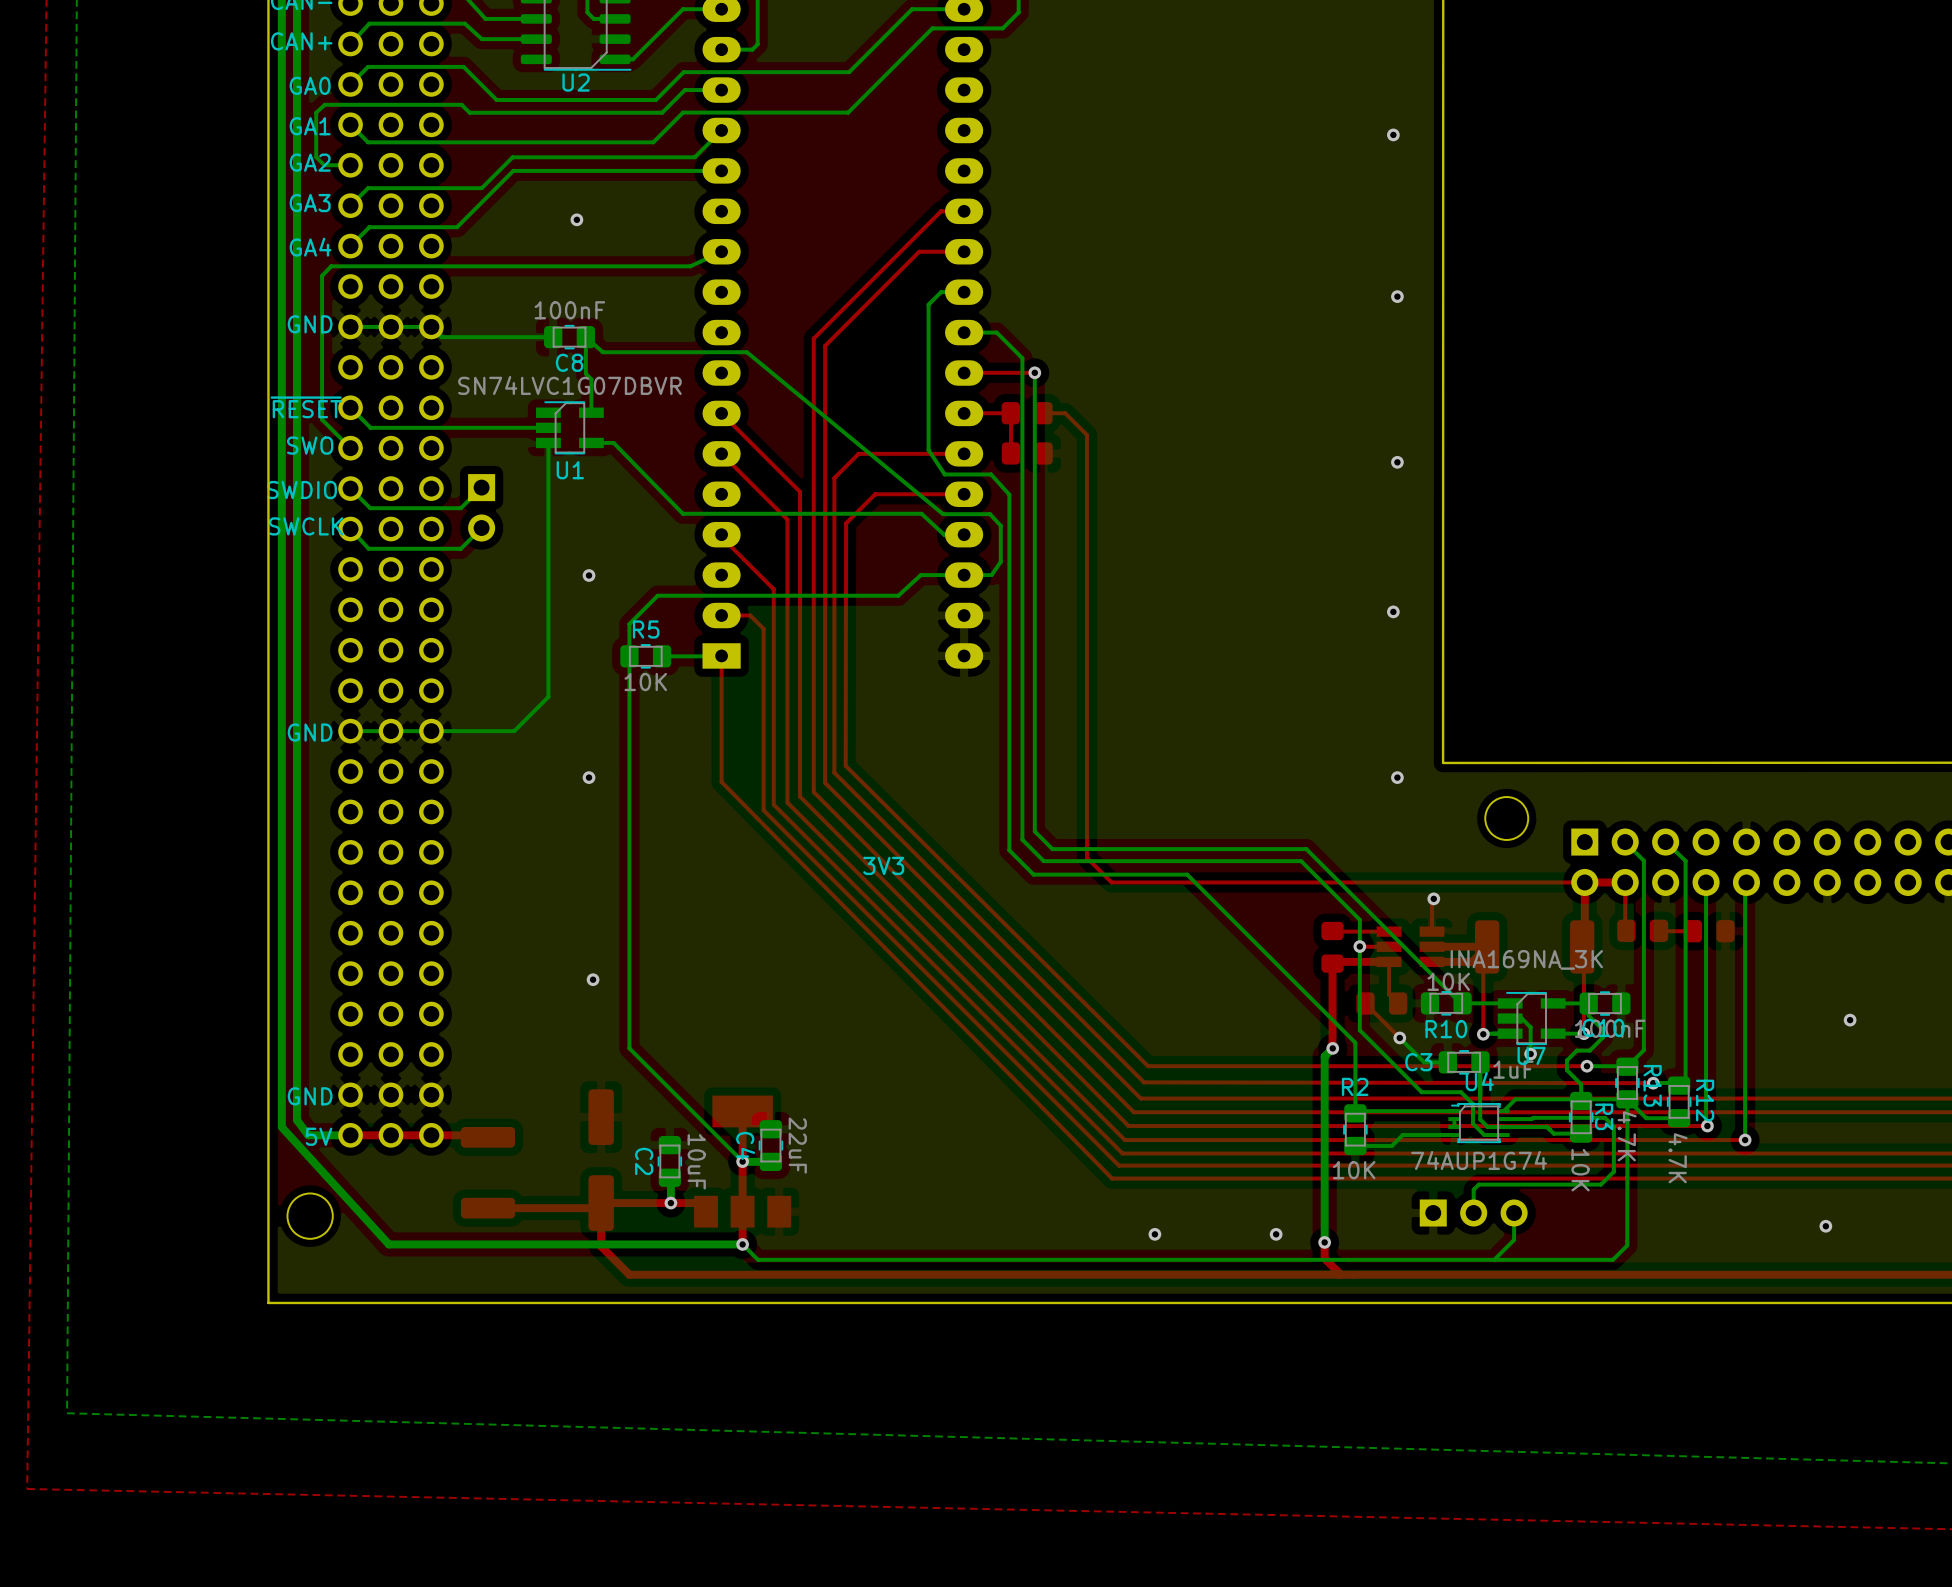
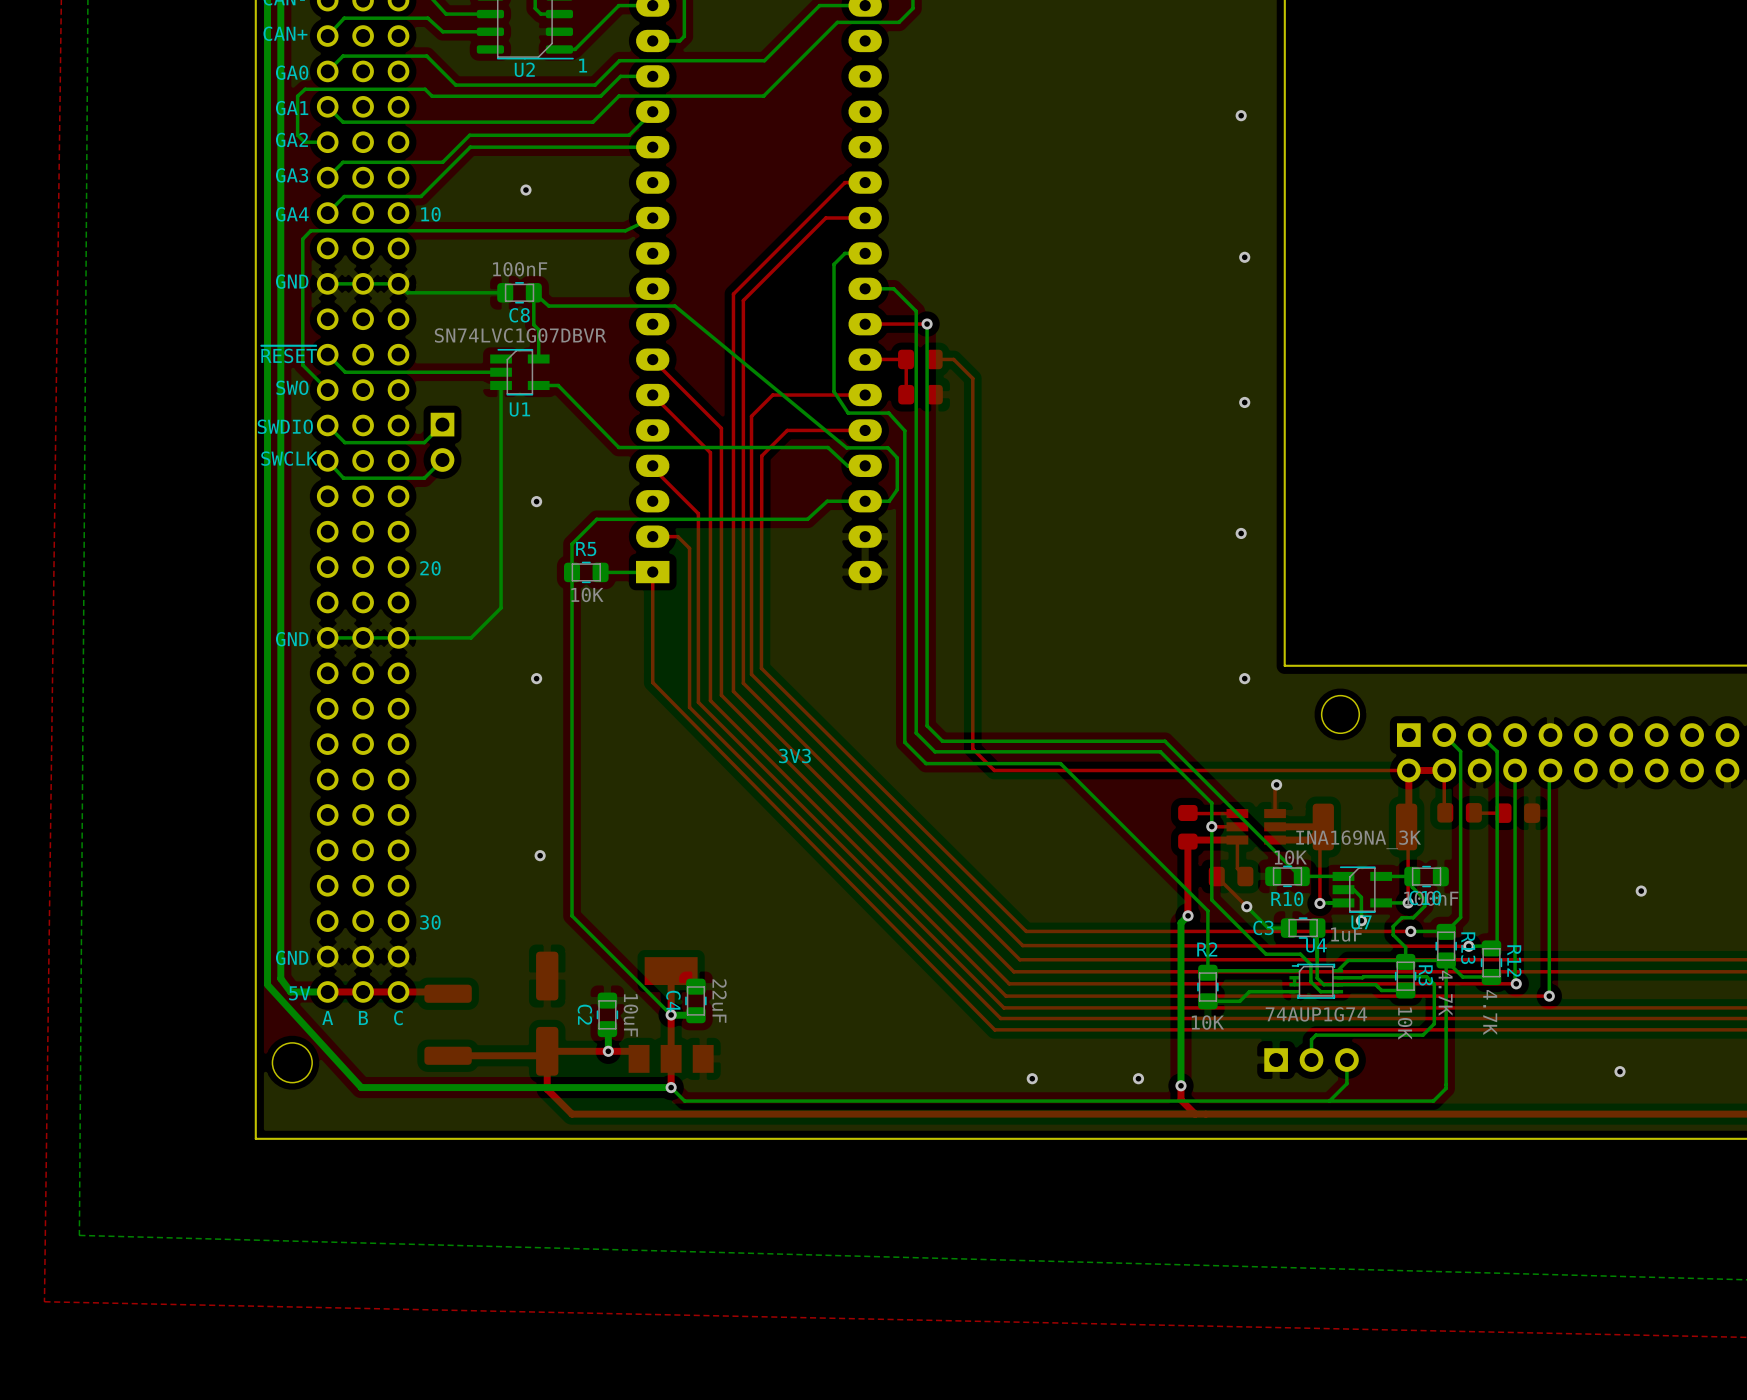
text: none -> 1 (583, 65)
text: none -> 10 (430, 214)
text: none -> 20 (430, 568)
text: none -> 30 (430, 922)
text: none -> A (327, 1018)
text: none -> B (363, 1018)
text: none -> C (398, 1018)

